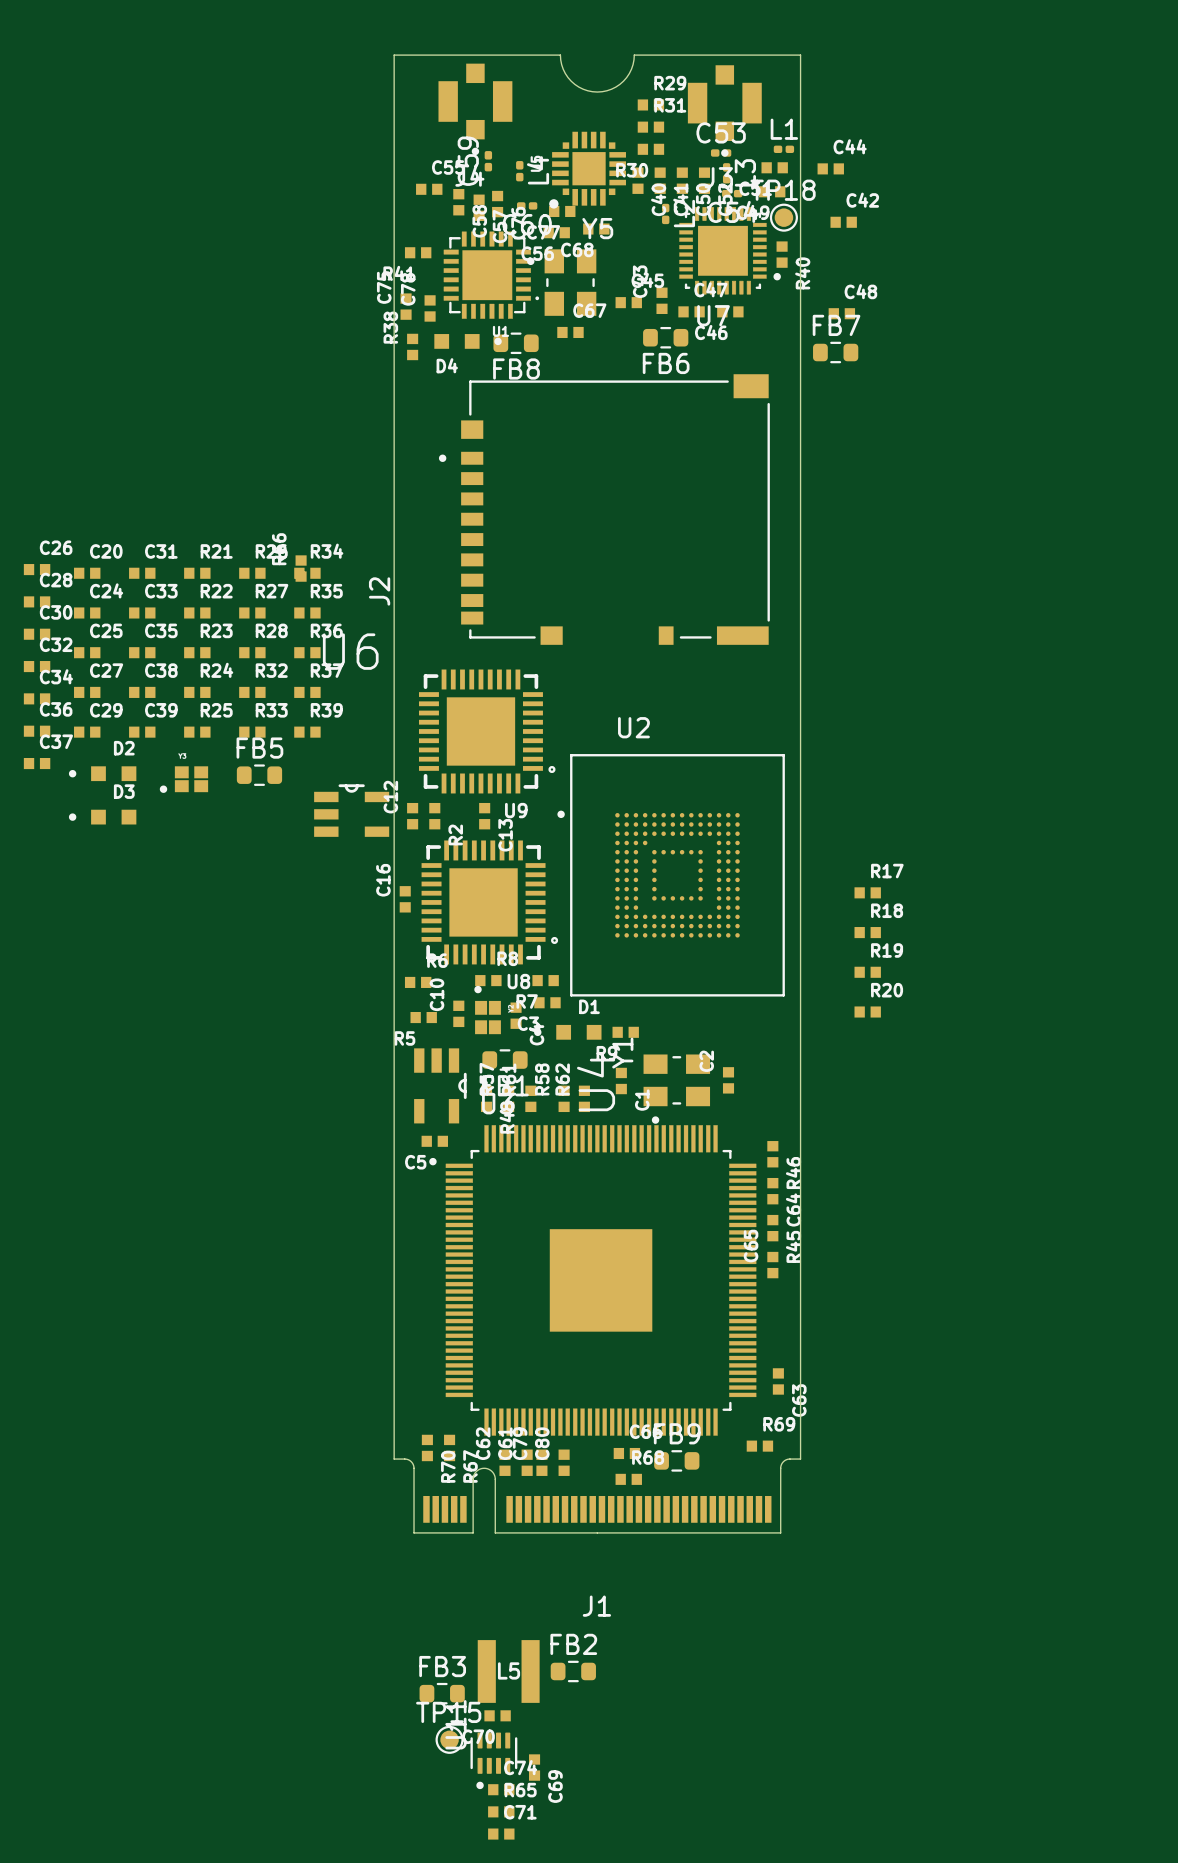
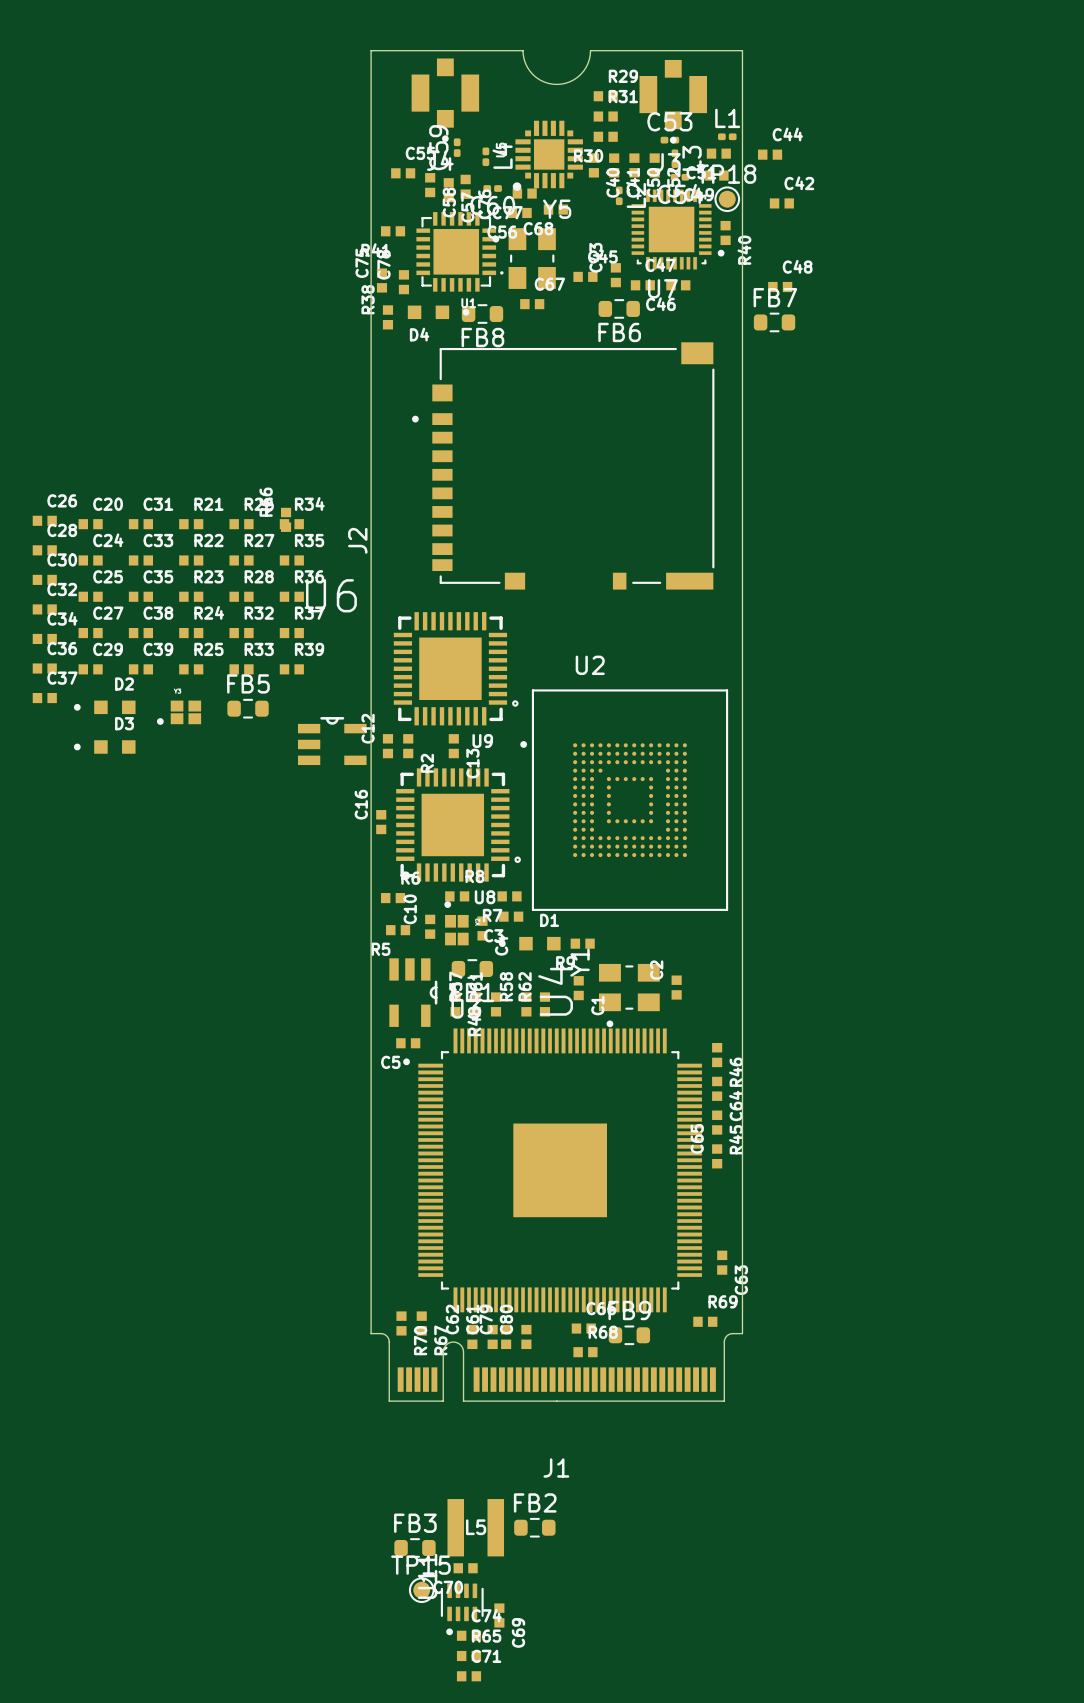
R17: (867, 892) -> none
R18: (867, 932) -> none
R19: (867, 972) -> none
R20: (867, 1012) -> none

